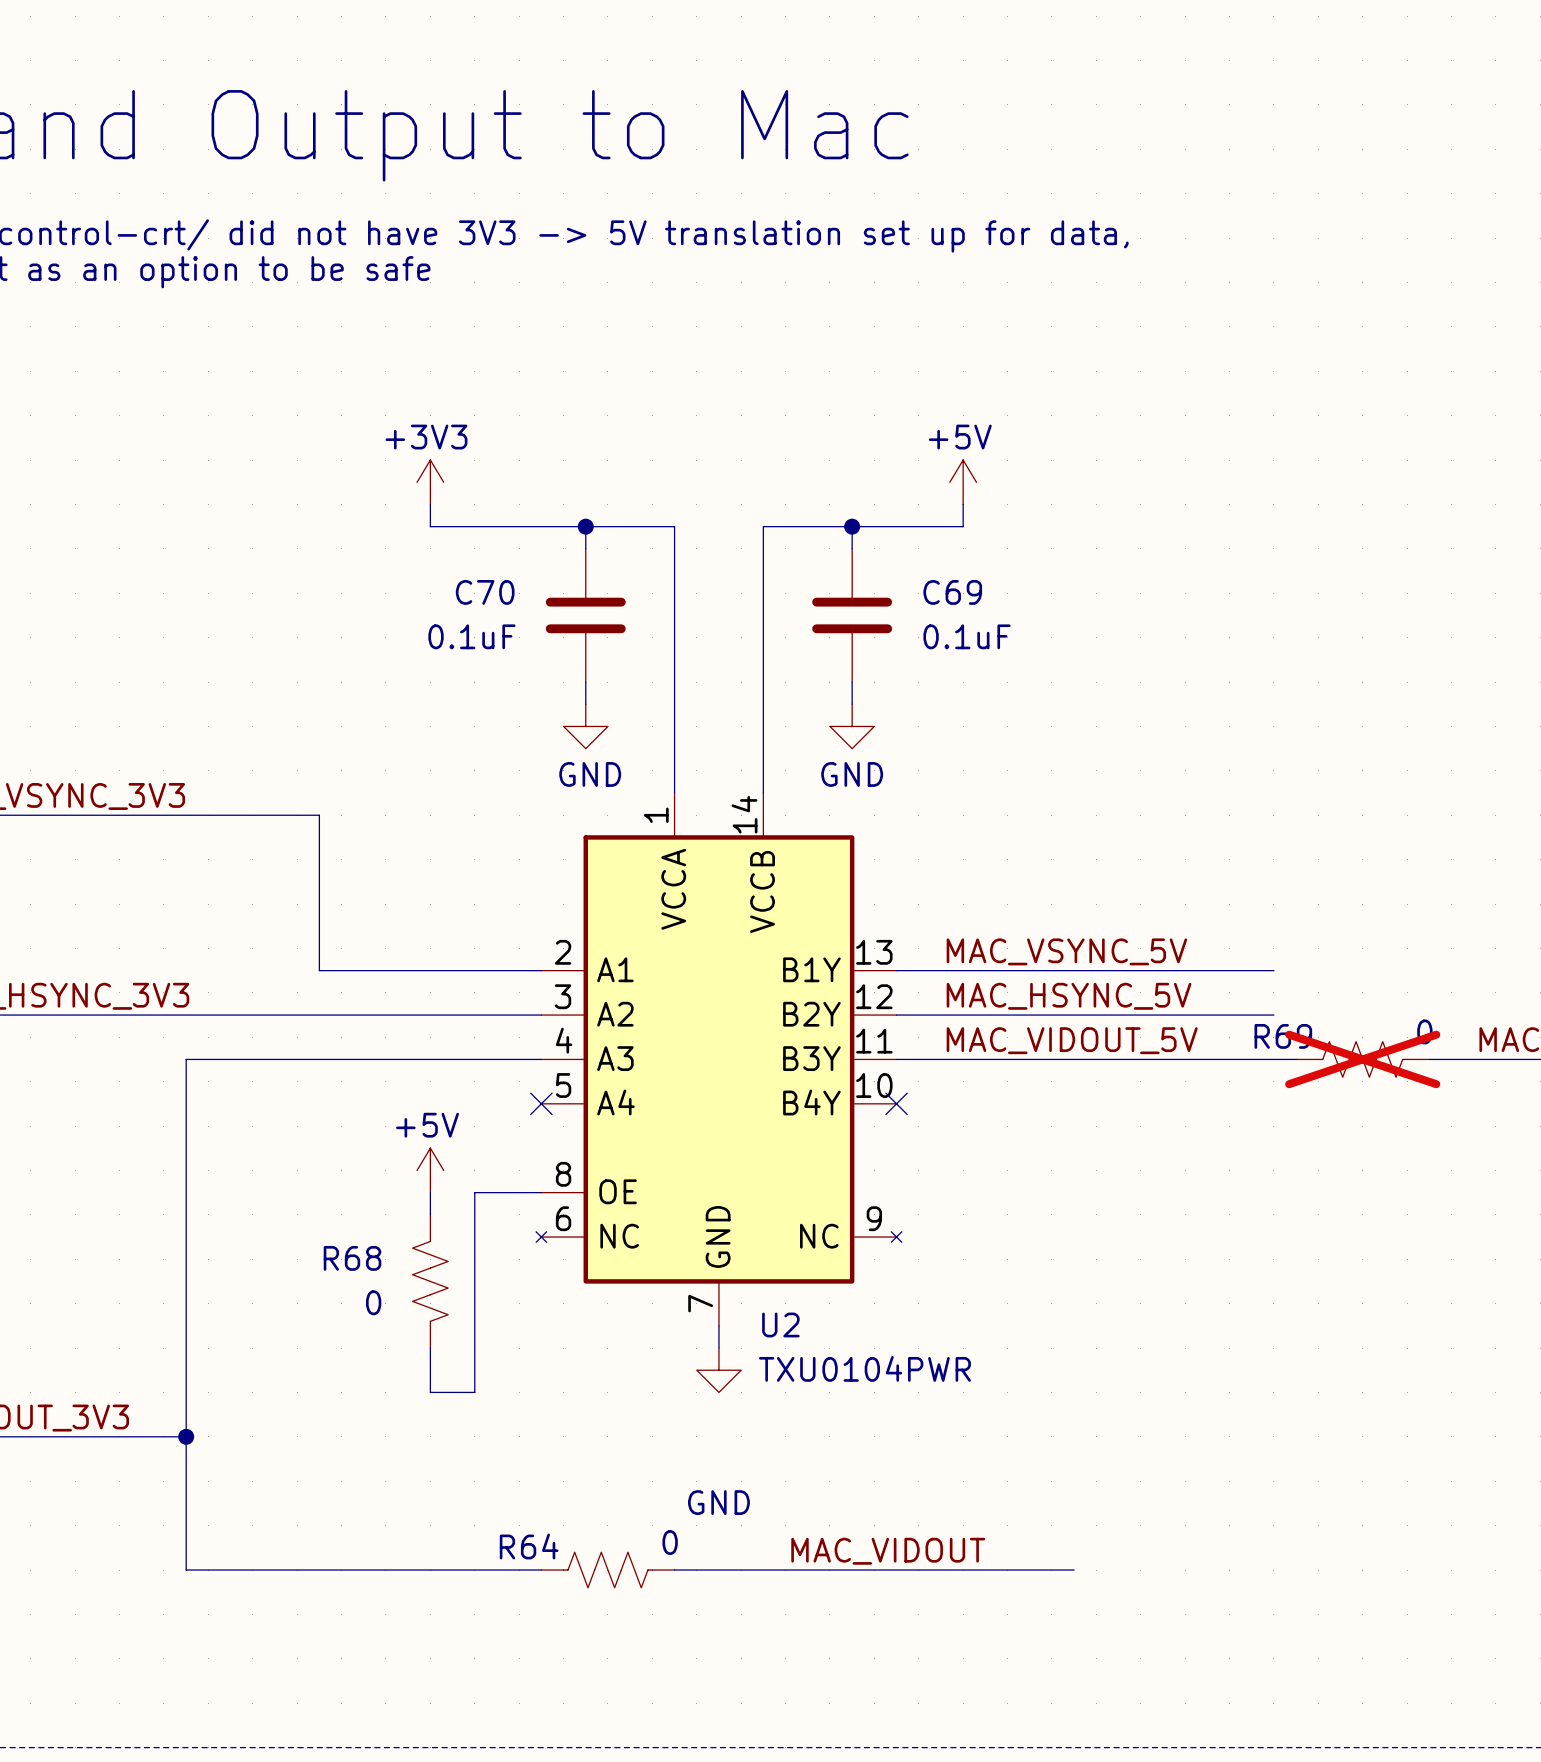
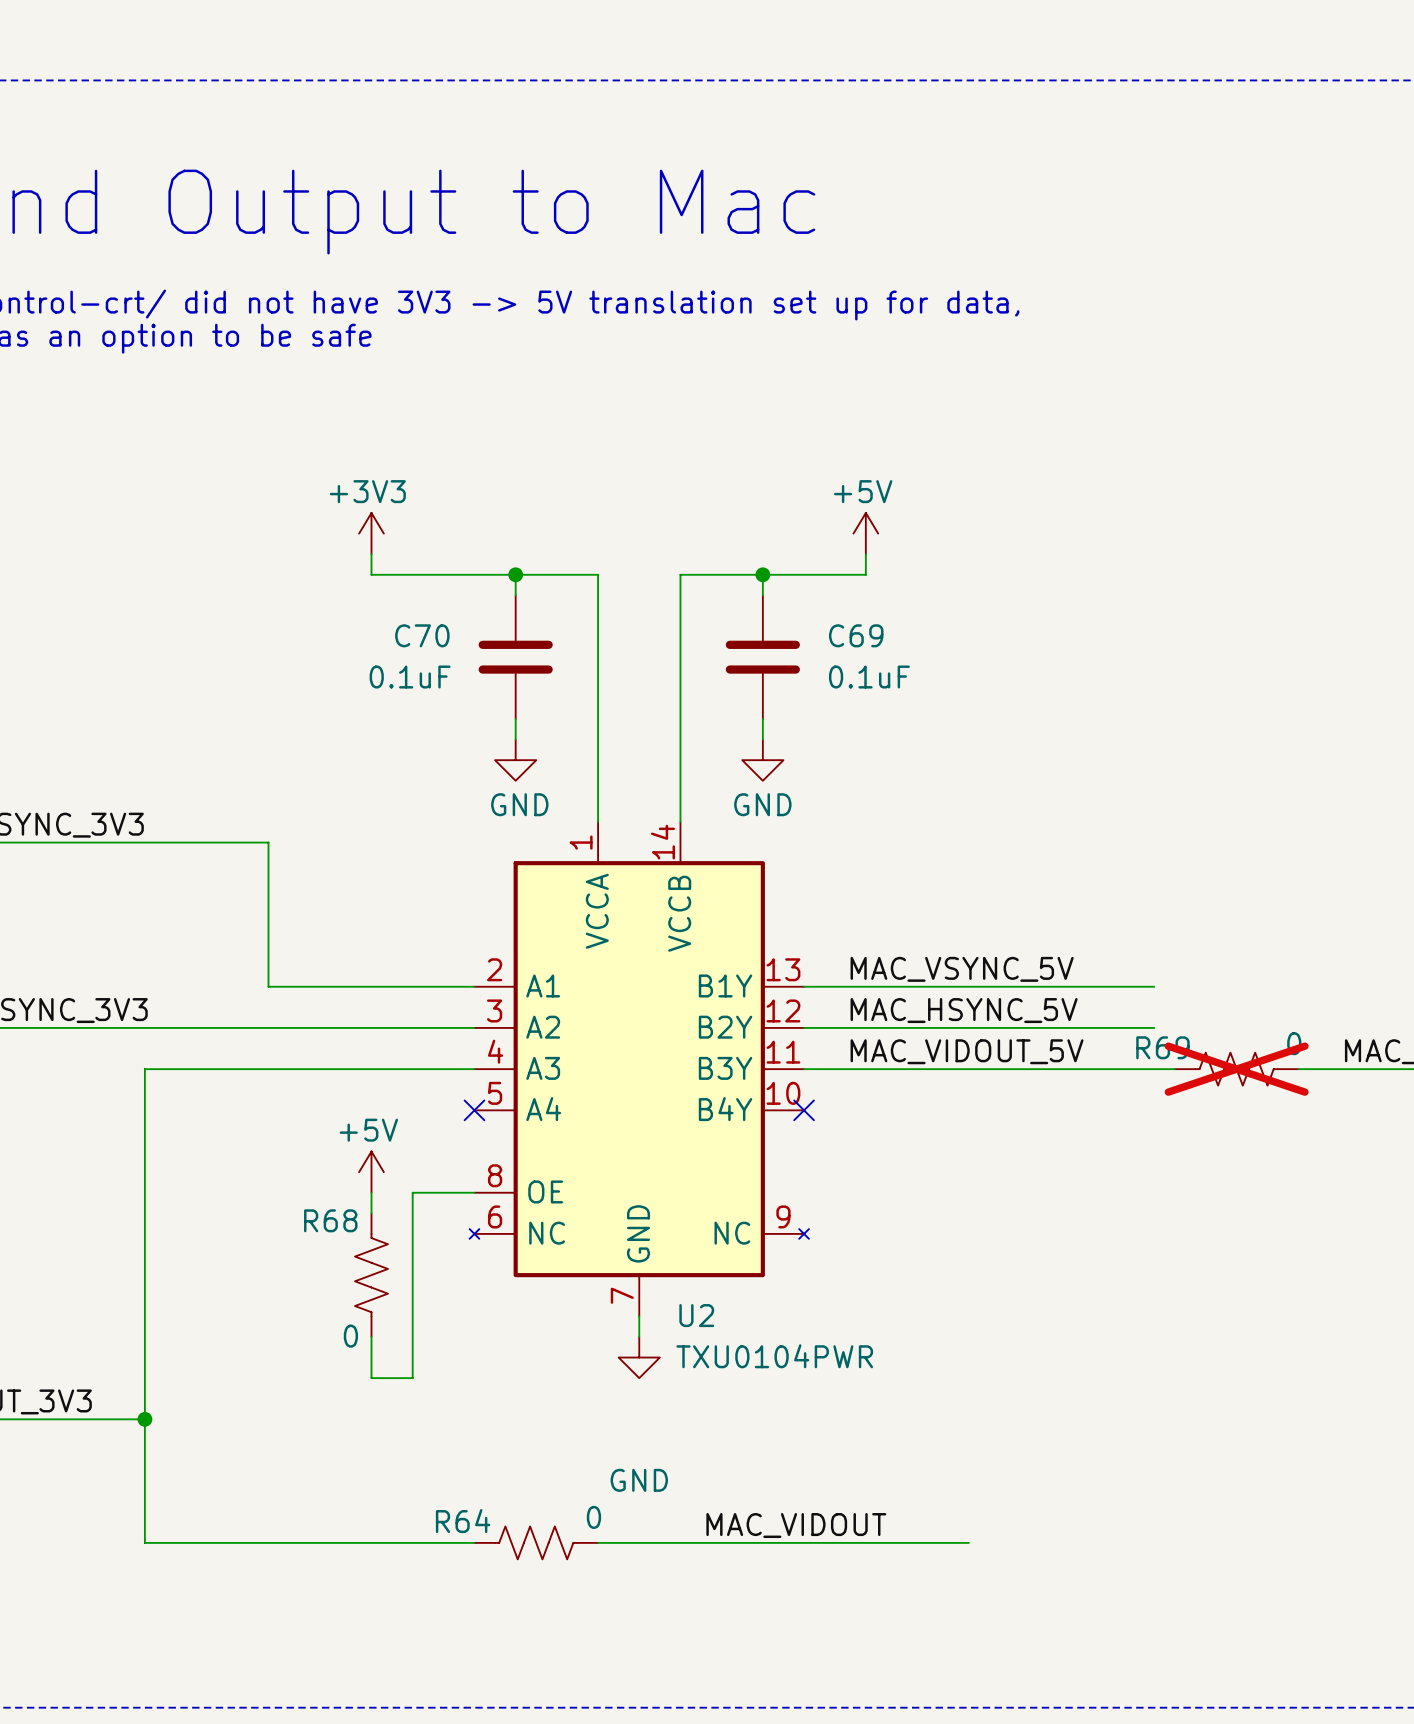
R68 name position: R68 (352, 1258) -> R68 (330, 1220)
R68 flip: as is (430, 1281) -> left-right (371, 1275)
R68 value position: 0 (373, 1302) -> 0 (350, 1336)

